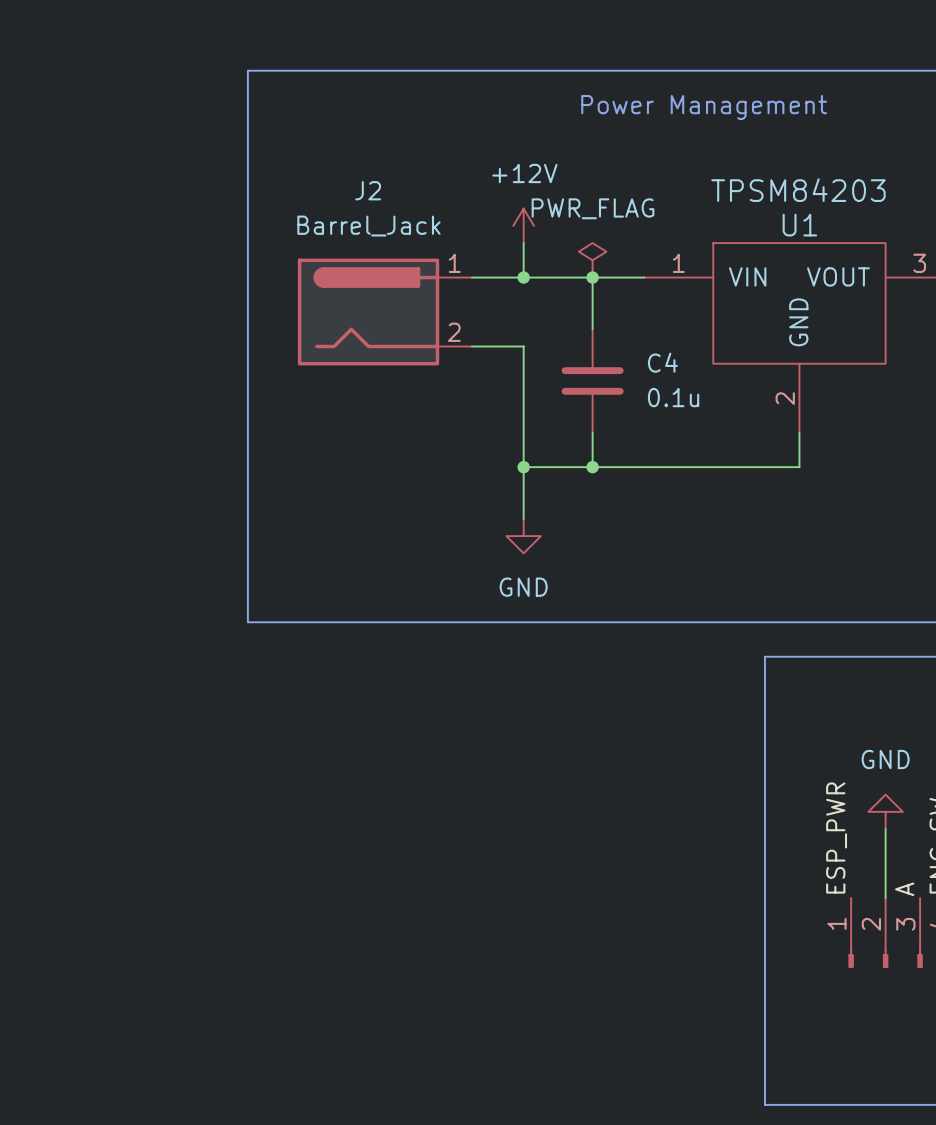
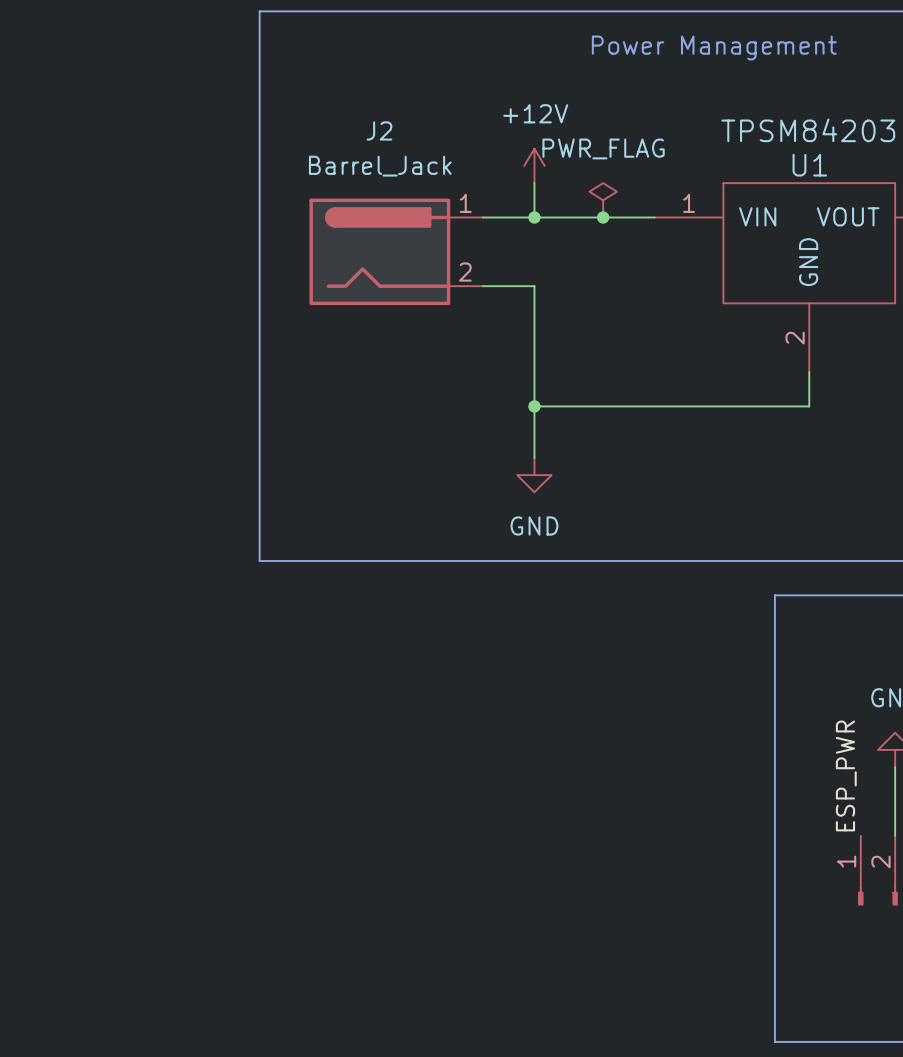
wire: (592, 277) (592, 329) -> none
C4: 0.1u (592, 380) -> none
wire: (592, 432) (592, 467) -> none
junction: (592, 467) -> none

